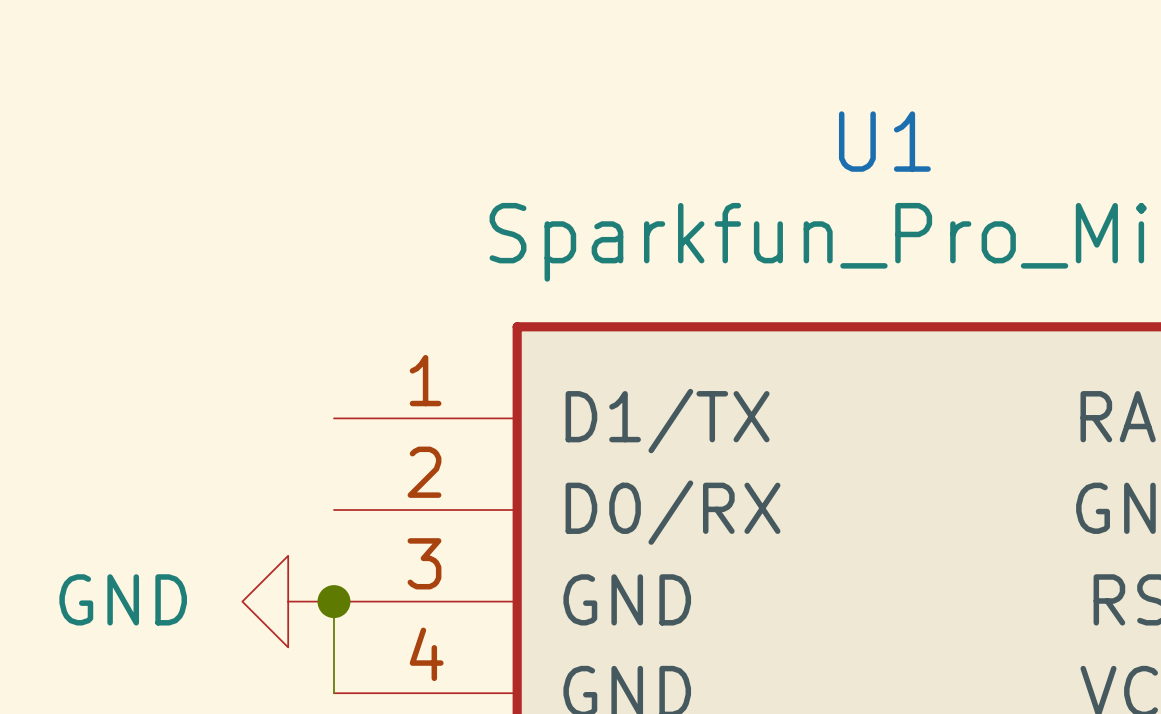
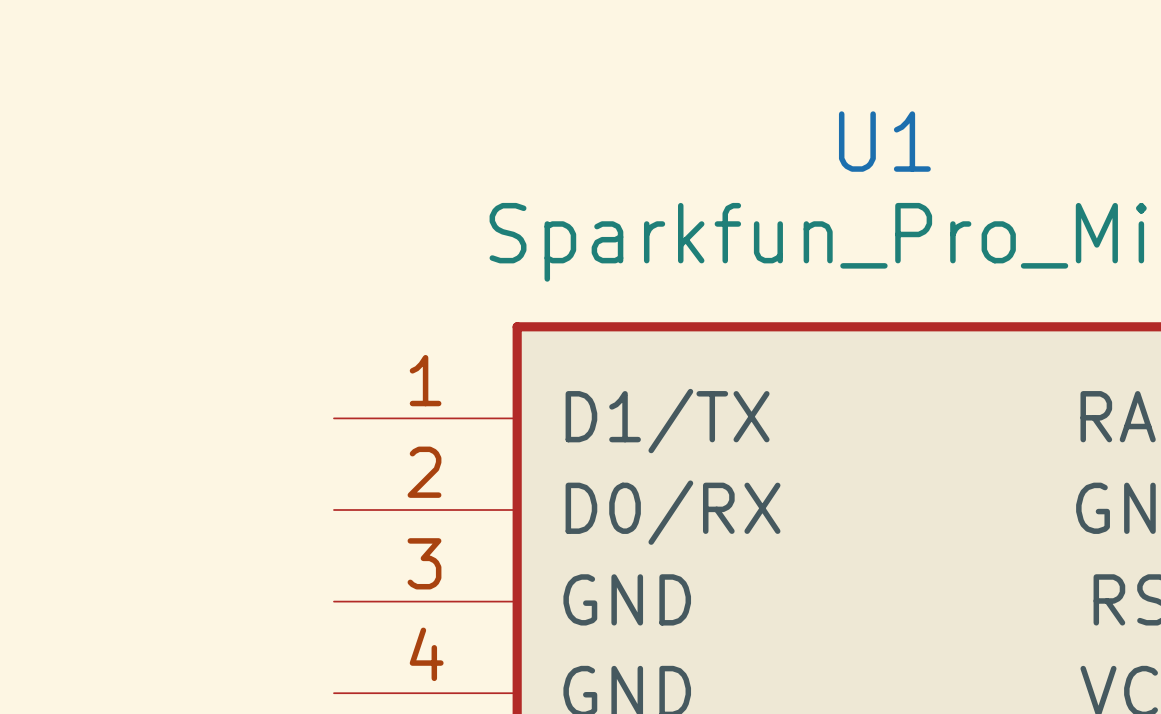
power symbol: GND (288, 601) -> none
wire: (333, 601) (333, 693) -> none
junction: (333, 601) -> none

